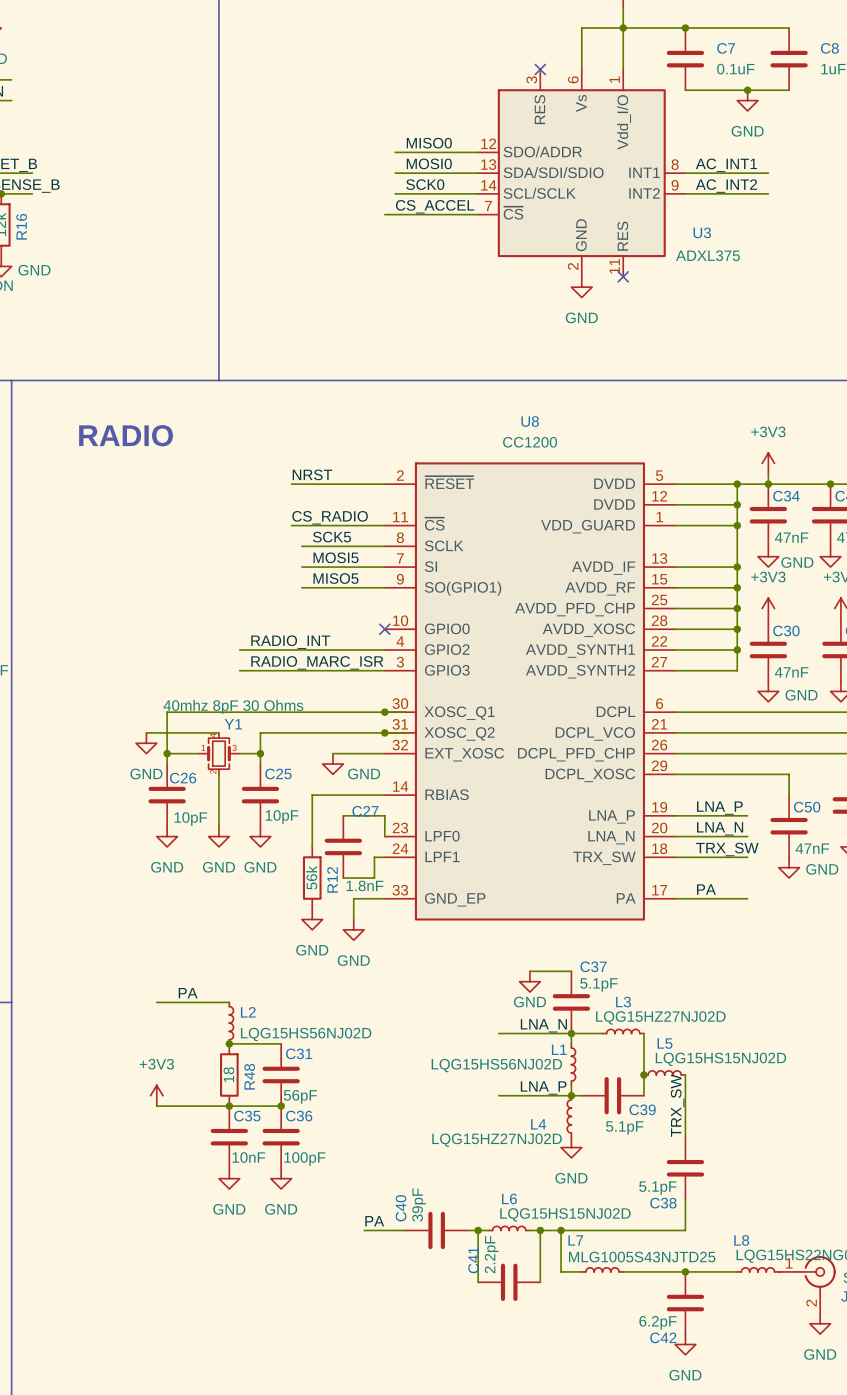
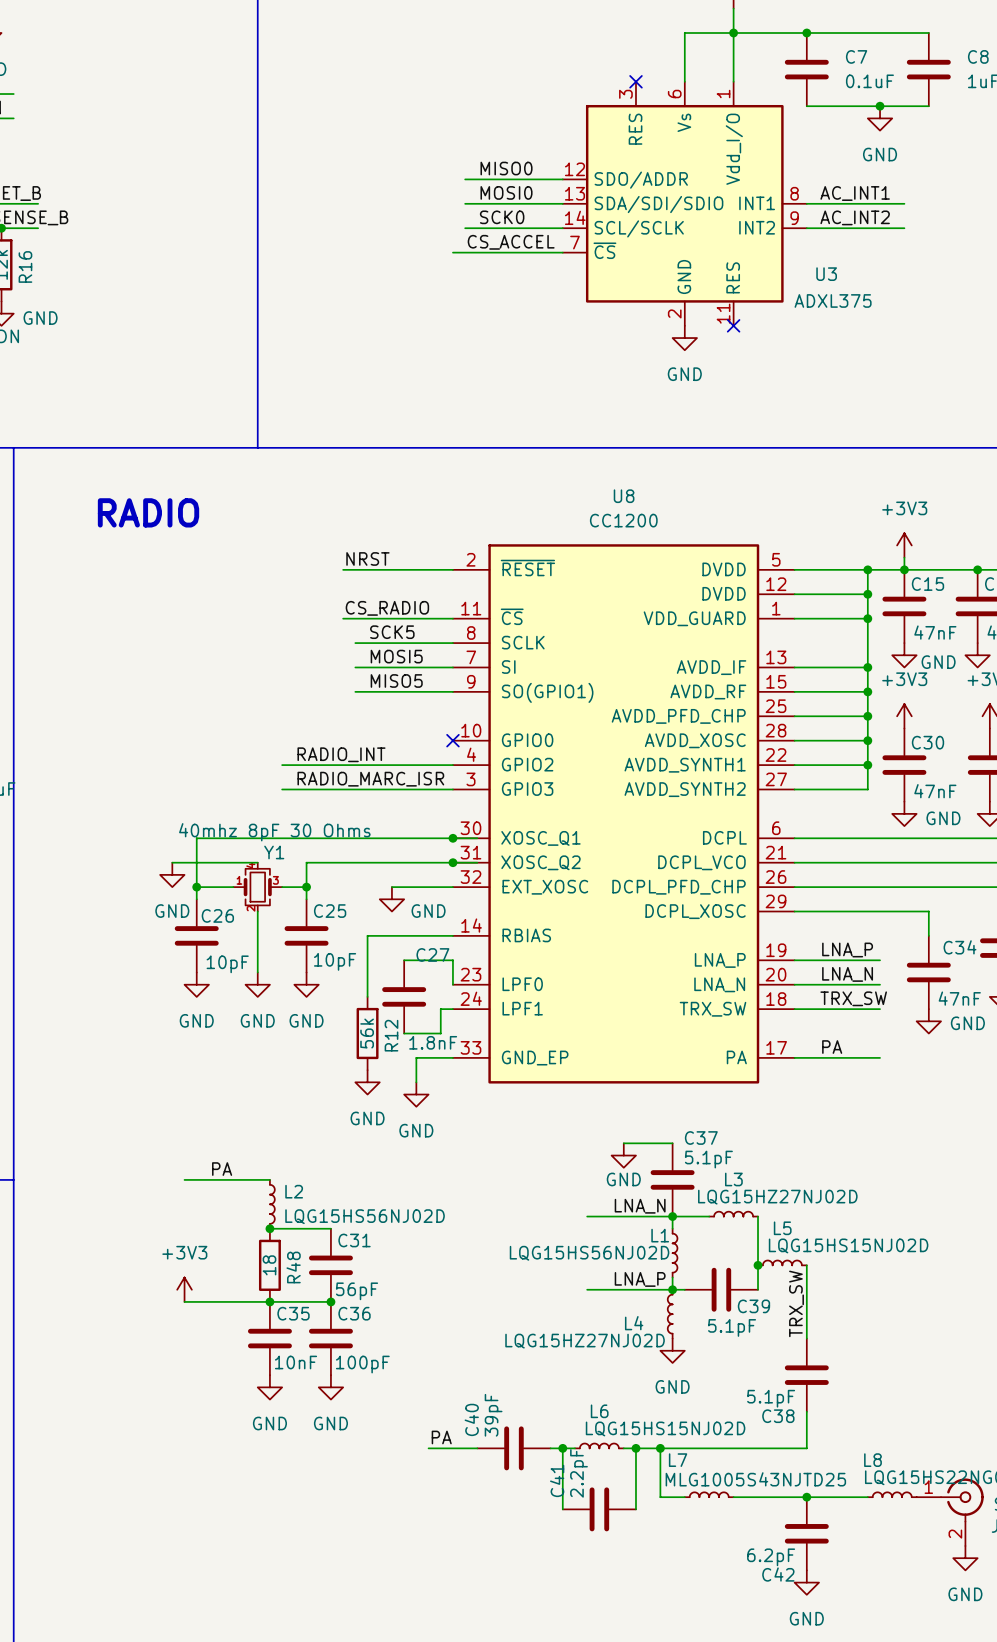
C34 name: C34 (786, 496) -> C15 (927, 584)
C50 name: C50 (807, 807) -> C34 (960, 947)

